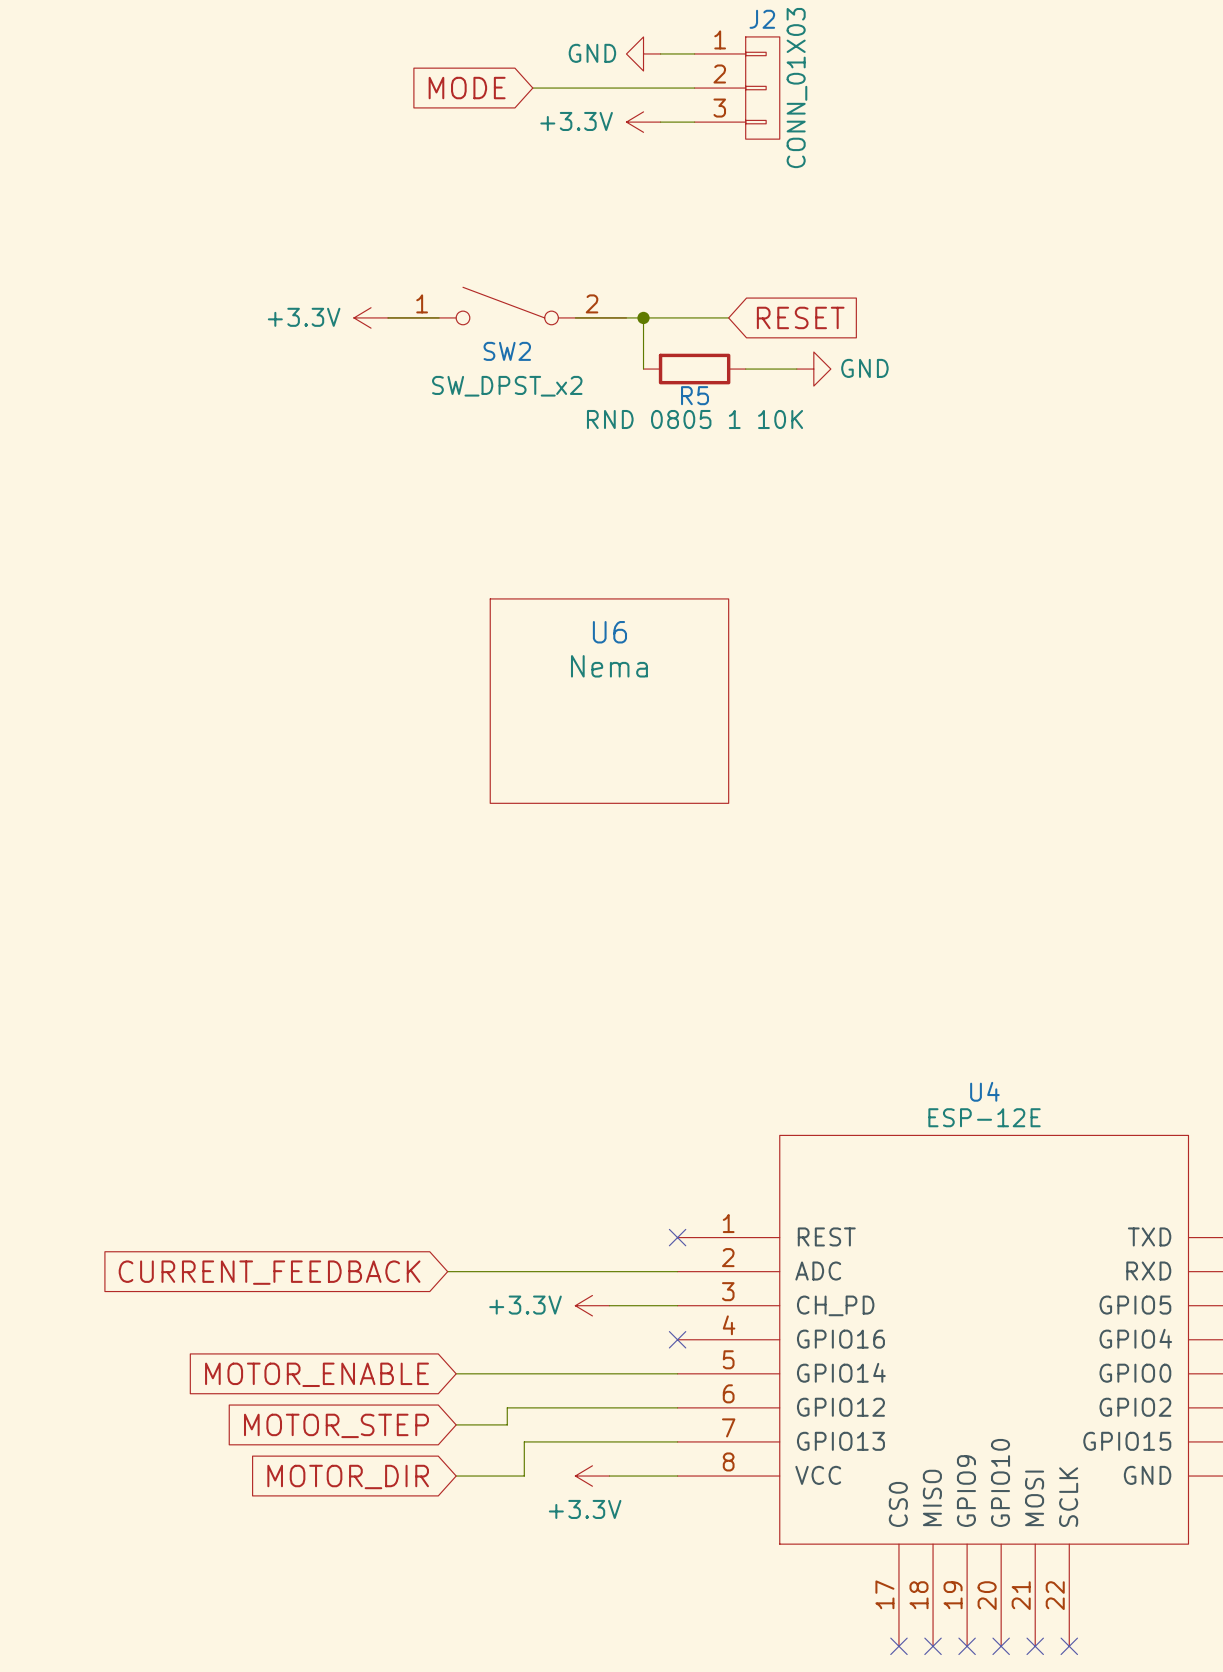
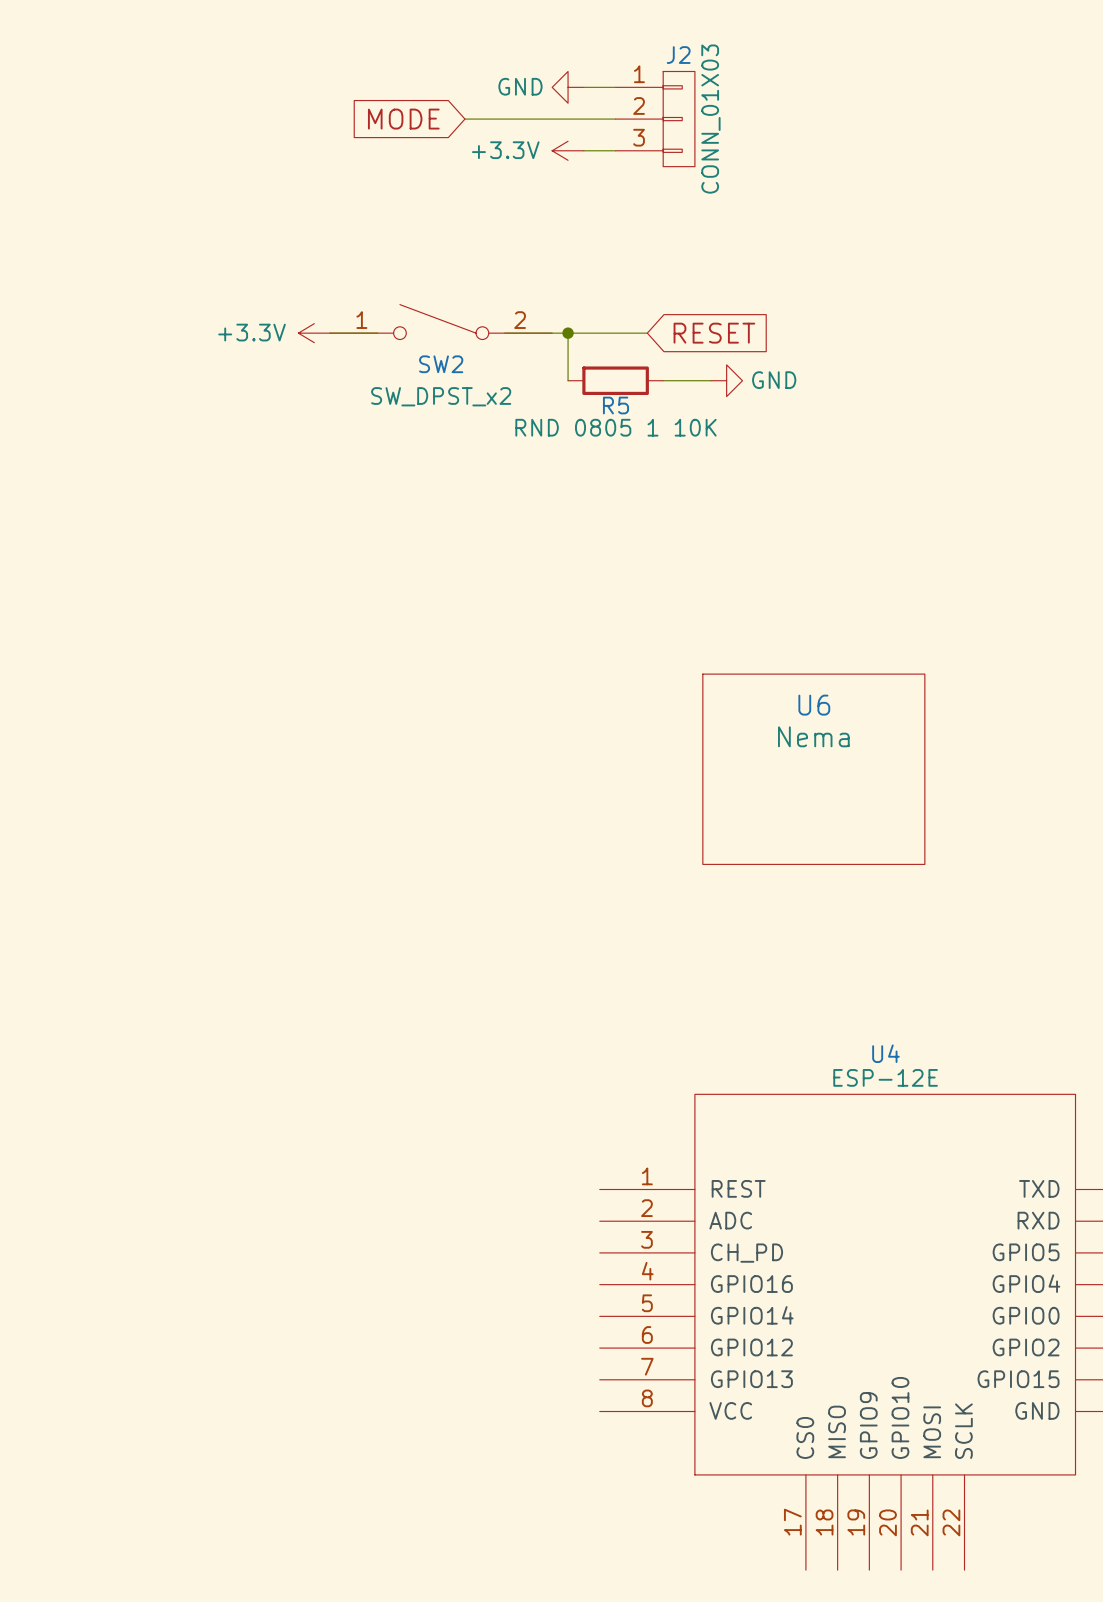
U6 position: (609, 701) -> (813, 769)
no-connect mark: (677, 1237) -> none
wire: (447, 1271) (677, 1271) -> none
global label: CURRENT_FEEDBACK (269, 1272) -> none
power symbol: +3.3V (592, 1305) -> none
wire: (609, 1305) (677, 1305) -> none
no-connect mark: (677, 1339) -> none
wire: (456, 1373) (677, 1373) -> none
global label: MOTOR_ENABLE (317, 1374) -> none
wire: (677, 1407) (507, 1407) (507, 1424) (456, 1424) -> none
global label: MOTOR_STEP (336, 1425) -> none
wire: (677, 1441) (524, 1441) (524, 1476) (456, 1476) -> none
global label: MOTOR_DIR (348, 1476) -> none
power symbol: +3.3V (592, 1476) -> none
wire: (609, 1476) (677, 1476) -> none
no-connect mark: (898, 1646) -> none
no-connect mark: (933, 1646) -> none
no-connect mark: (967, 1646) -> none
no-connect mark: (1001, 1646) -> none
no-connect mark: (1035, 1646) -> none
no-connect mark: (1069, 1646) -> none

